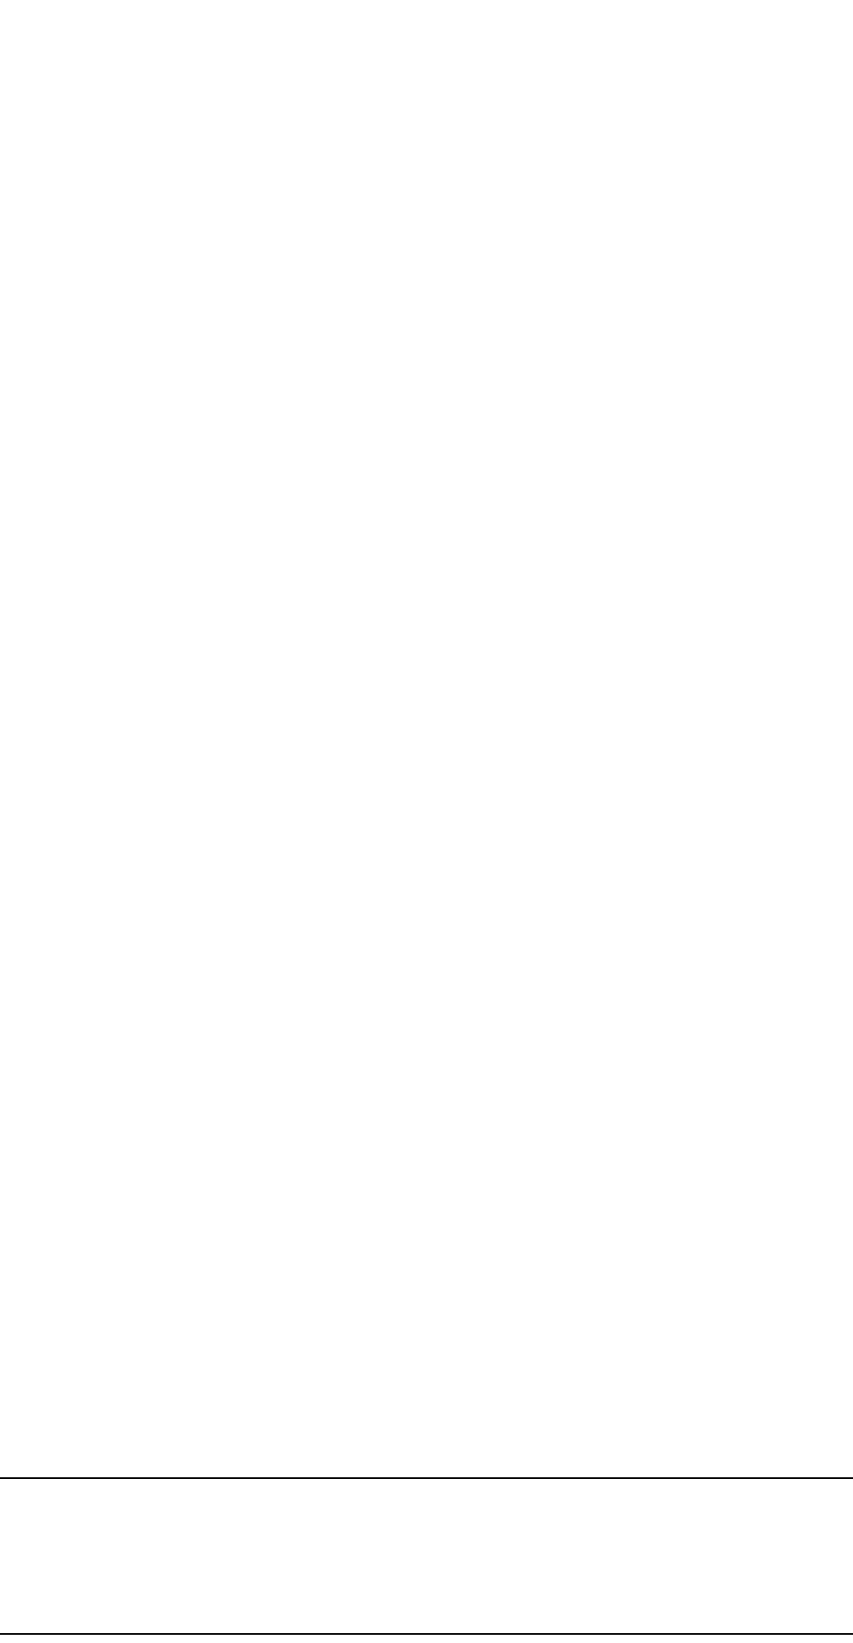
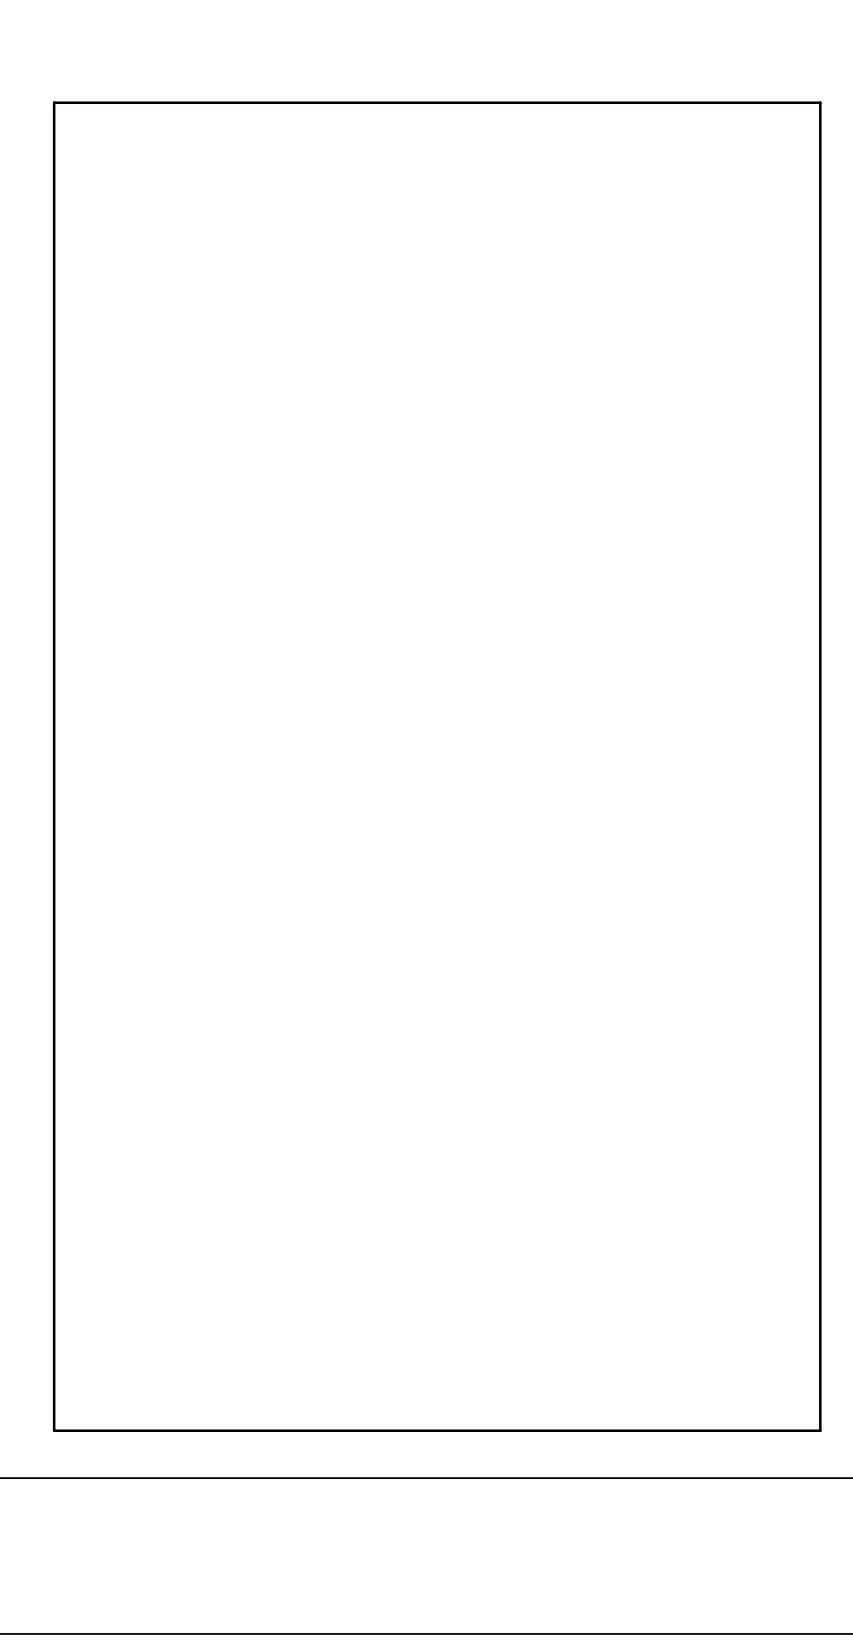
line: none -> (54, 102) (820, 102) (820, 1430) (54, 1430) (54, 102)

